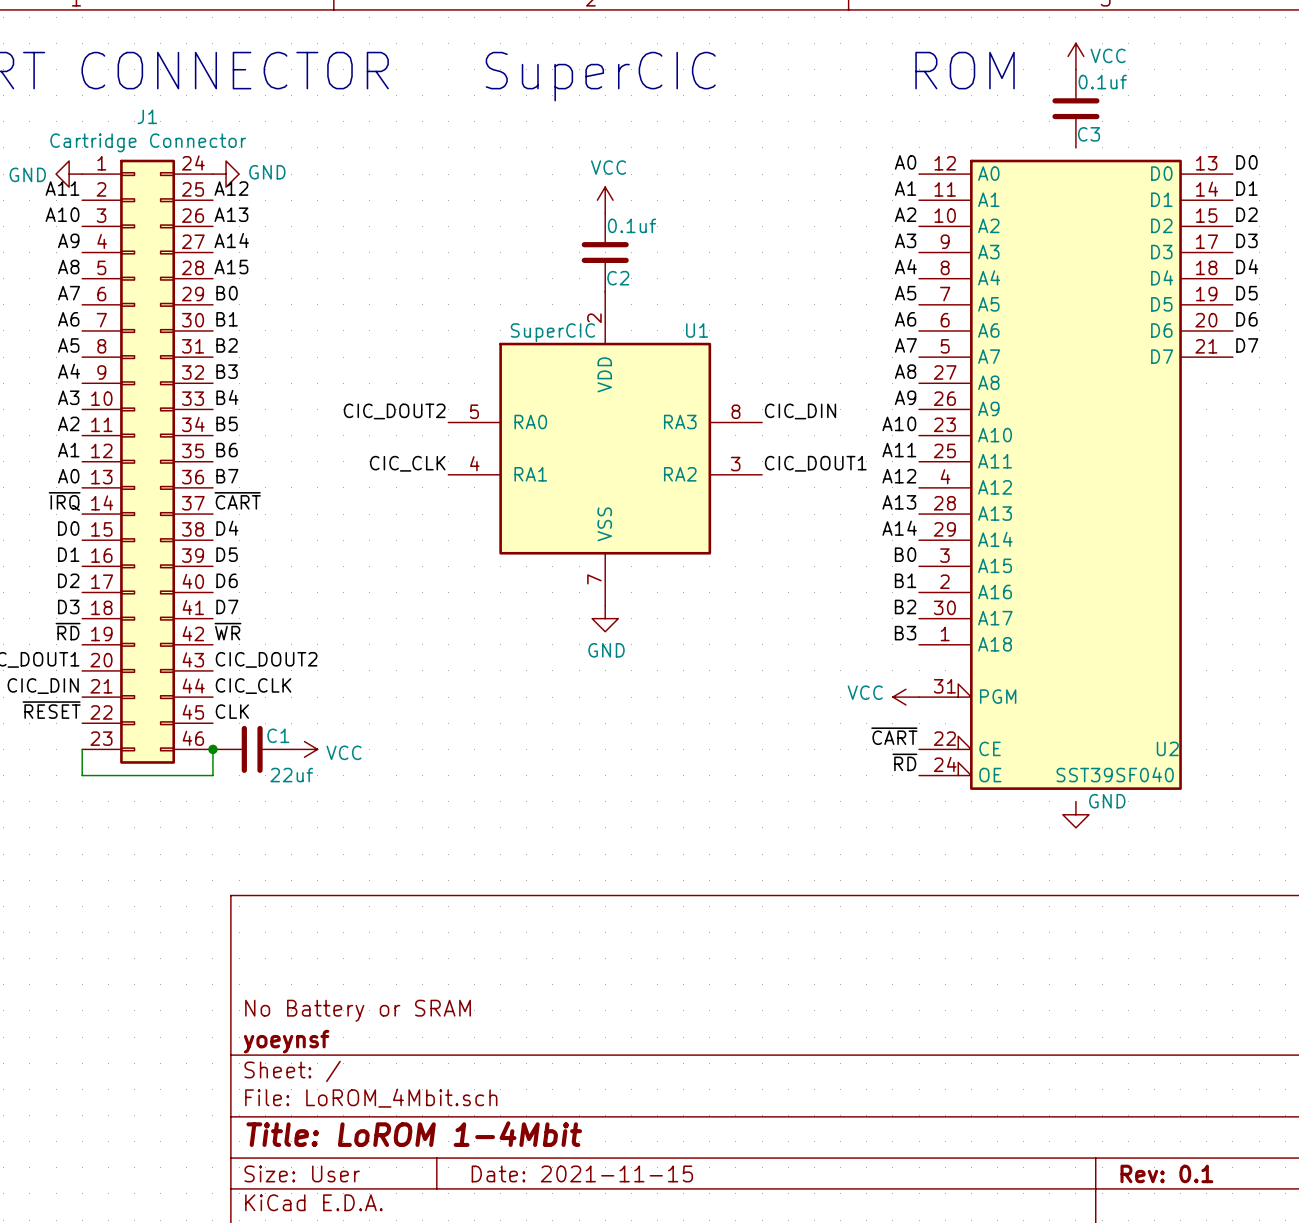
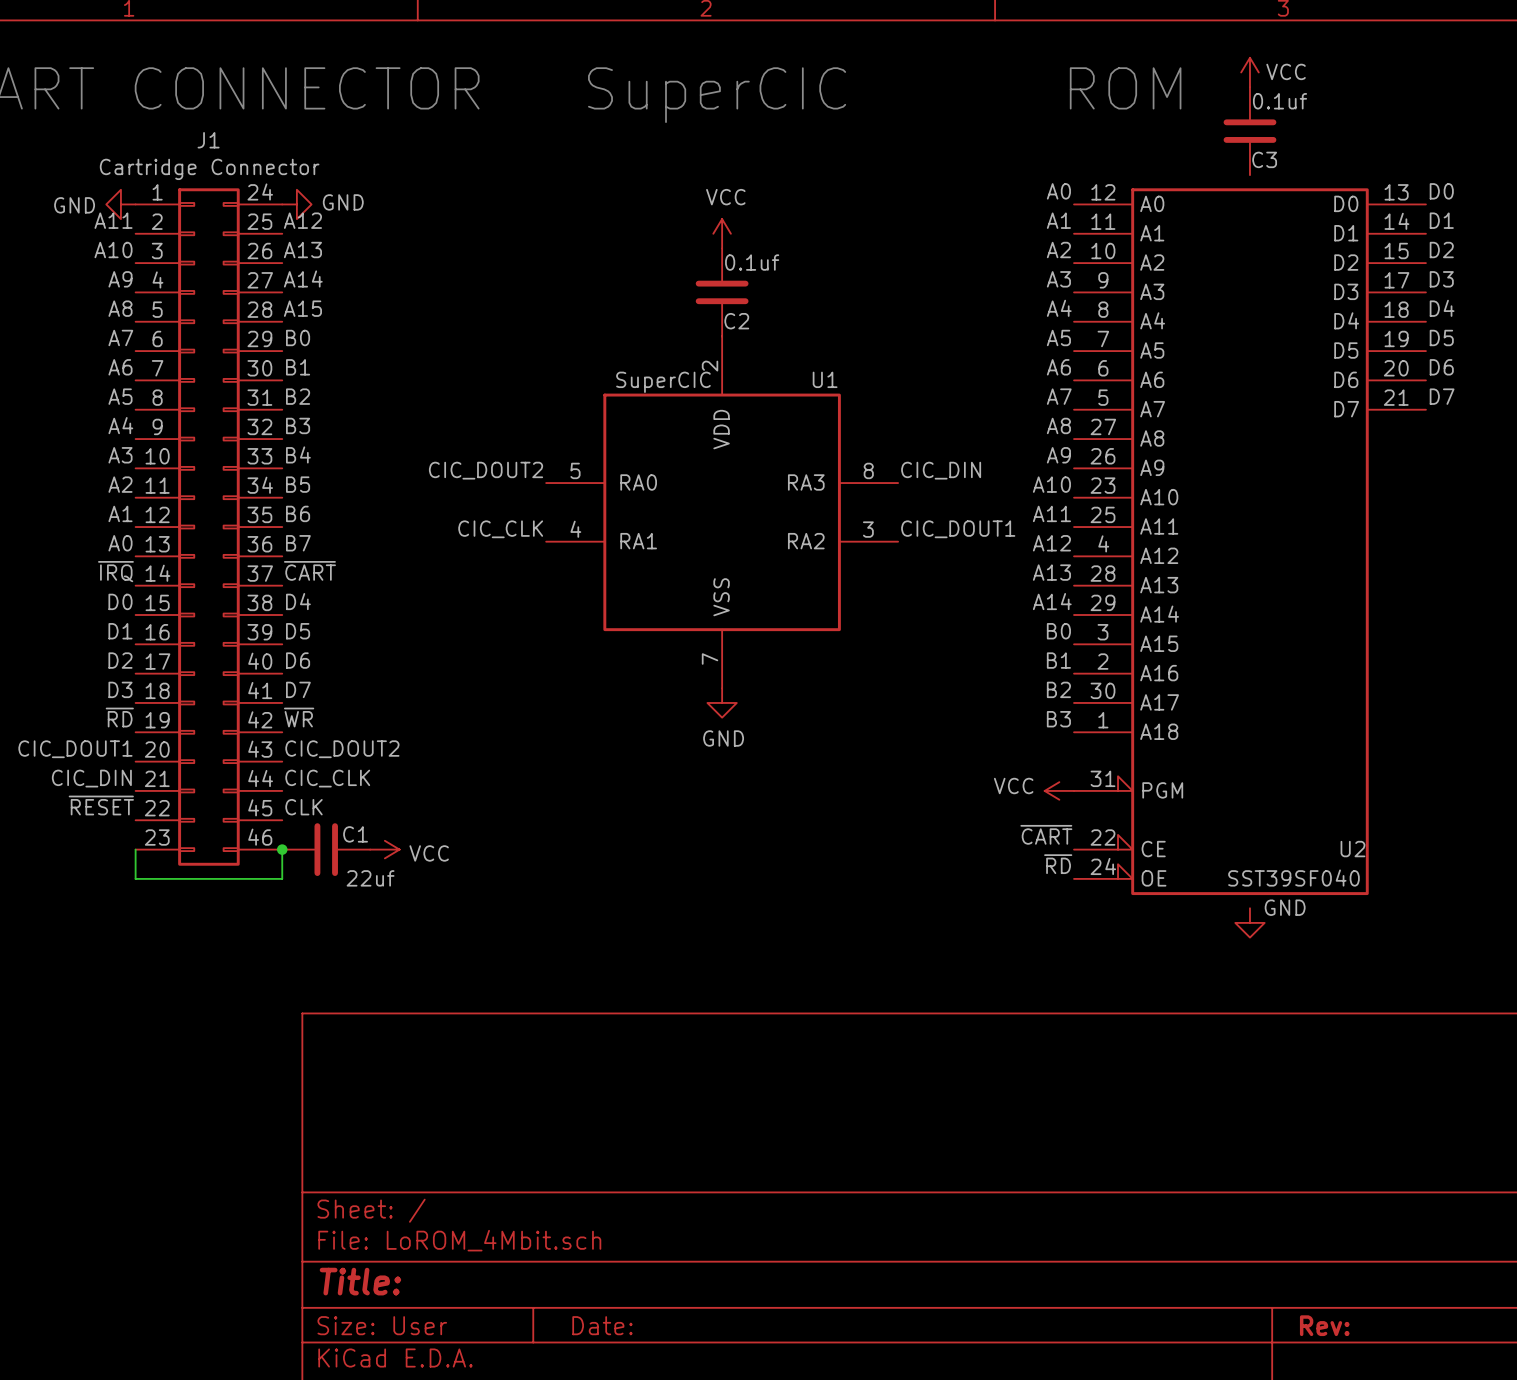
title block: No Battery or SRAM (358, 1010) -> none
title block: yoeynsf (286, 1041) -> none
title block: Title: LoROM 1-4Mbit (414, 1134) -> Title: (360, 1281)
title block: Date: 2021-11-15 (582, 1173) -> Date: (602, 1325)
title block: Rev: 0.1 (1166, 1173) -> Rev: (1324, 1325)

